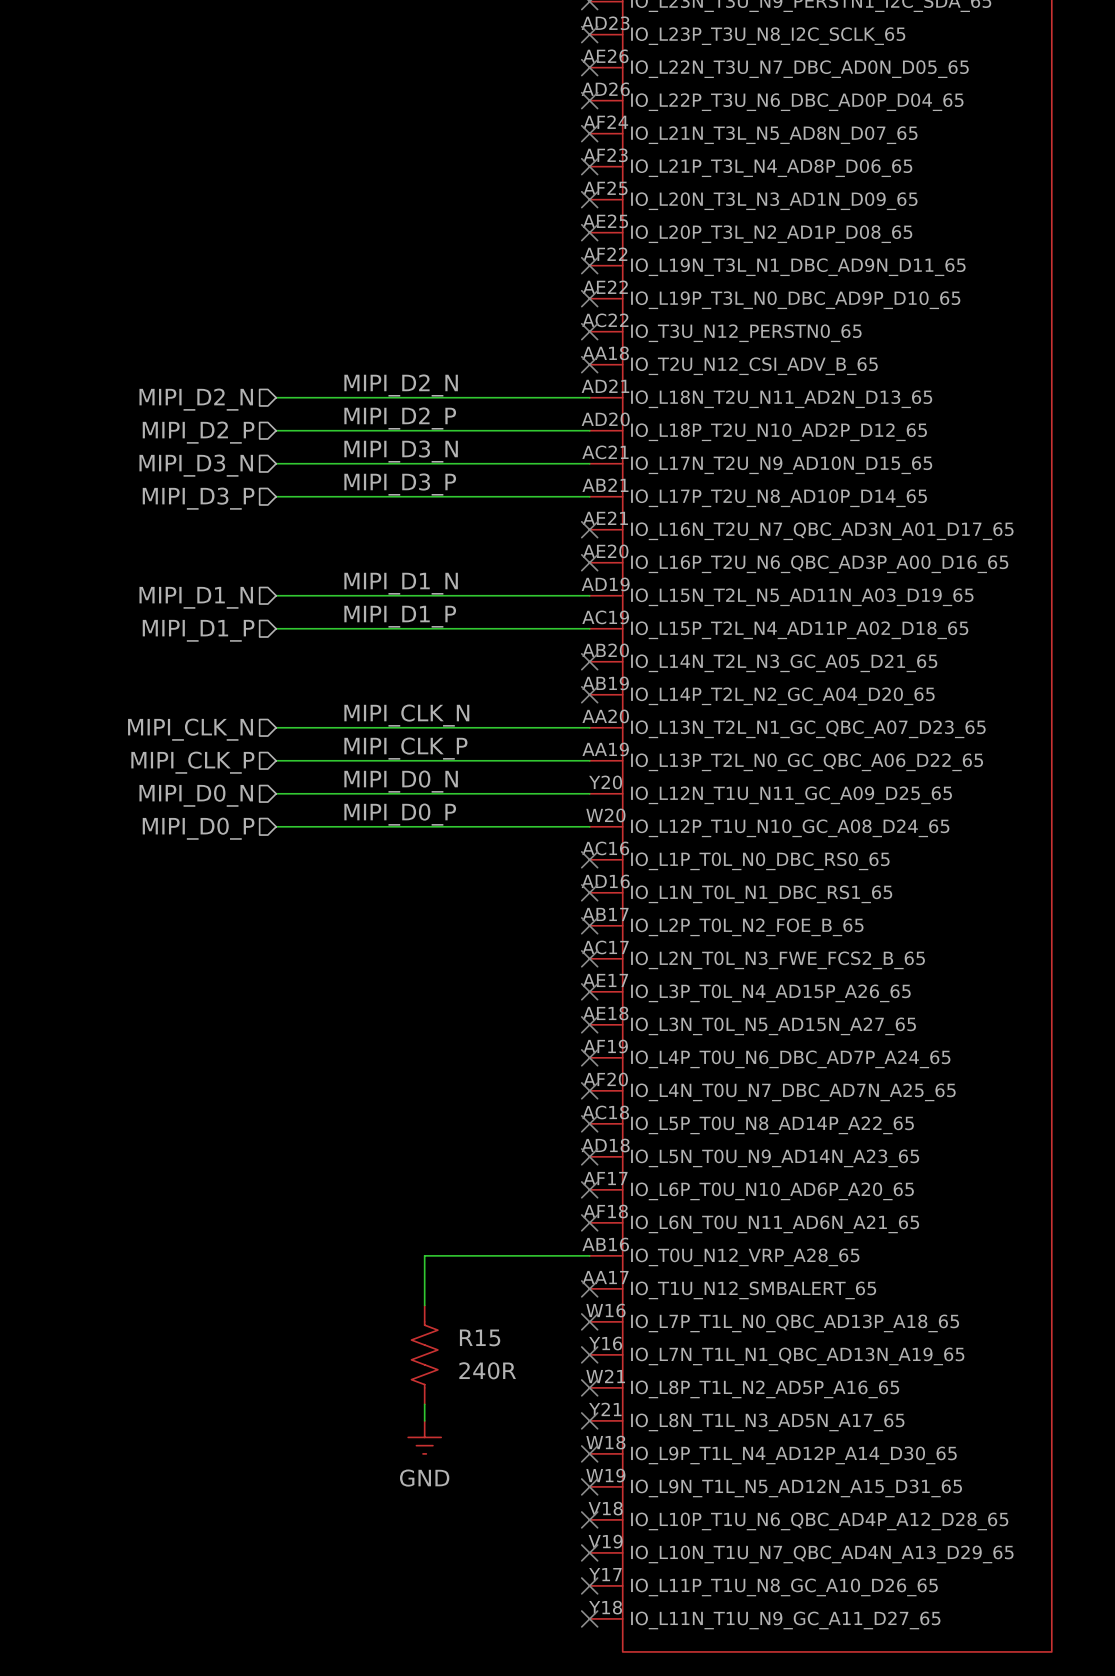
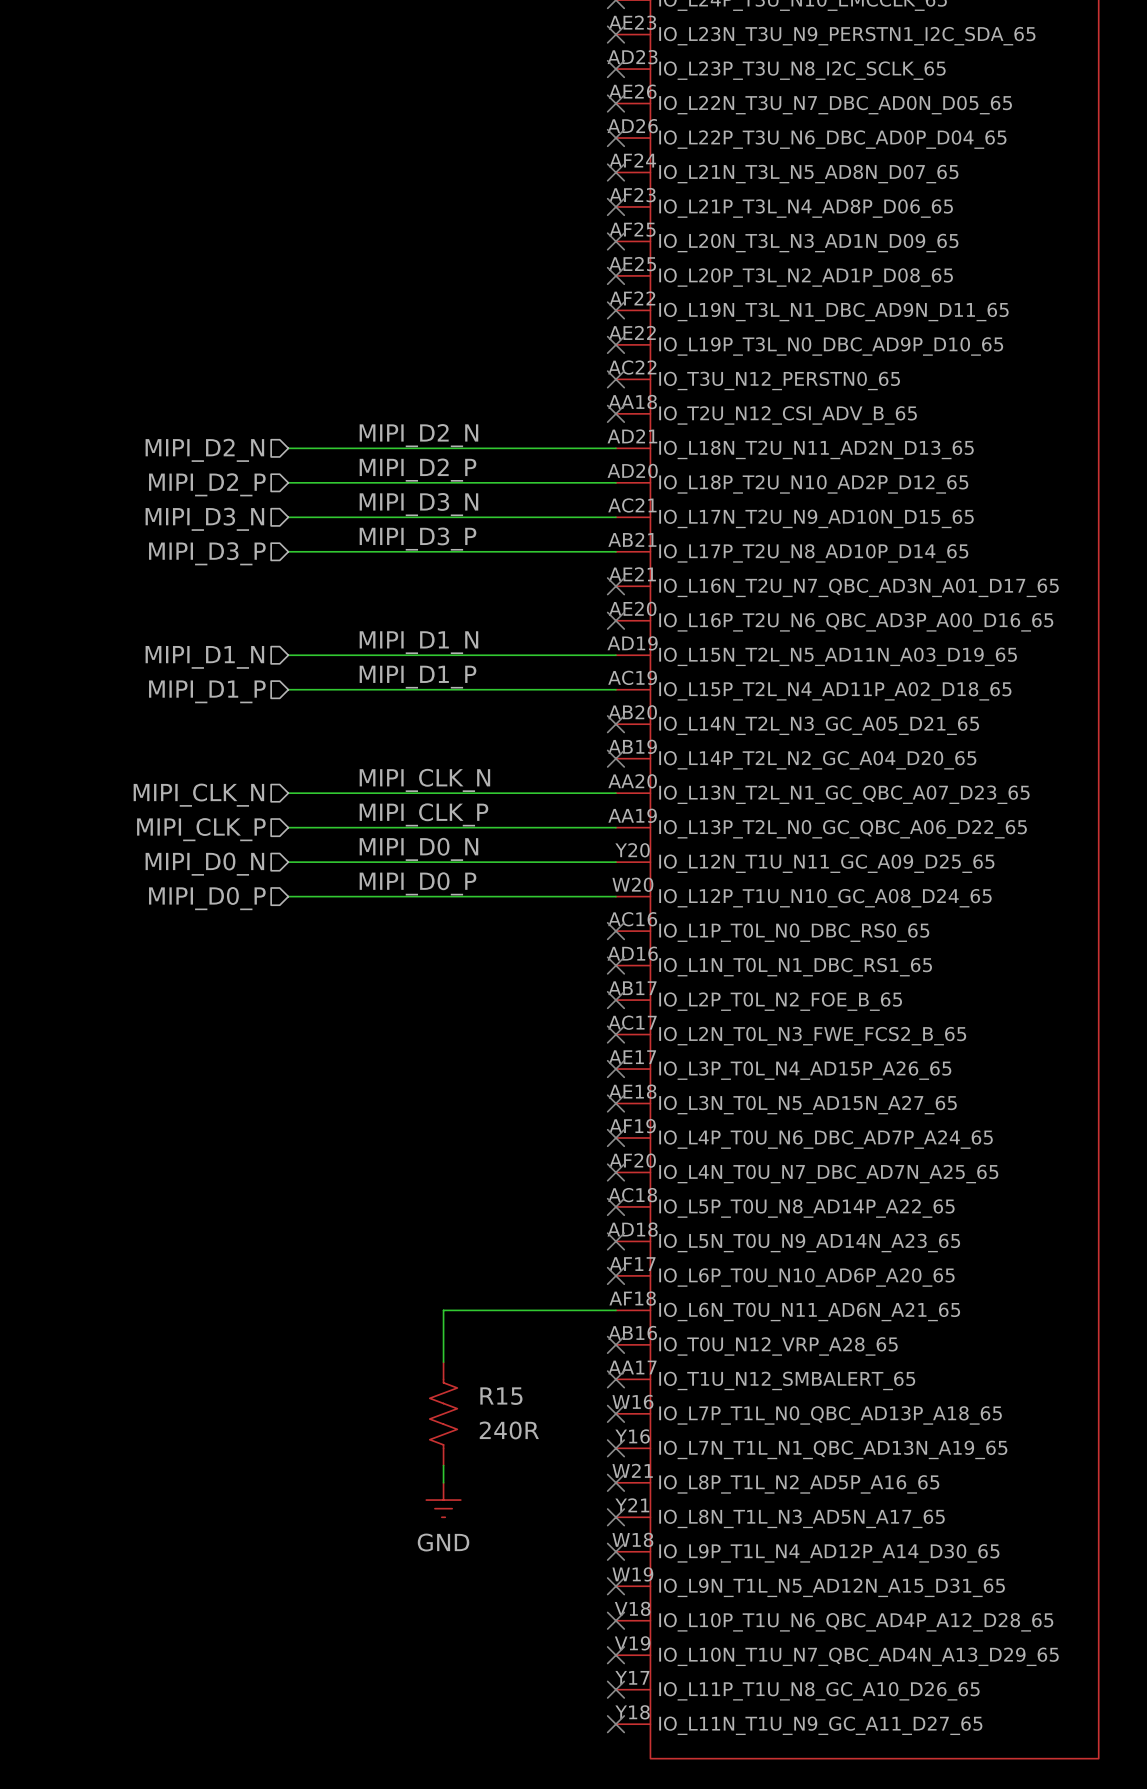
no-connect mark position: (589, 1222) -> (615, 1344)
wire: (424, 1255) (589, 1255) -> (443, 1344) (443, 1310) (615, 1310)
R15 position: (424, 1354) -> (443, 1413)
wire: (424, 1404) (424, 1420) -> (443, 1465) (443, 1482)
power symbol position: GND (424, 1437) -> GND (443, 1500)

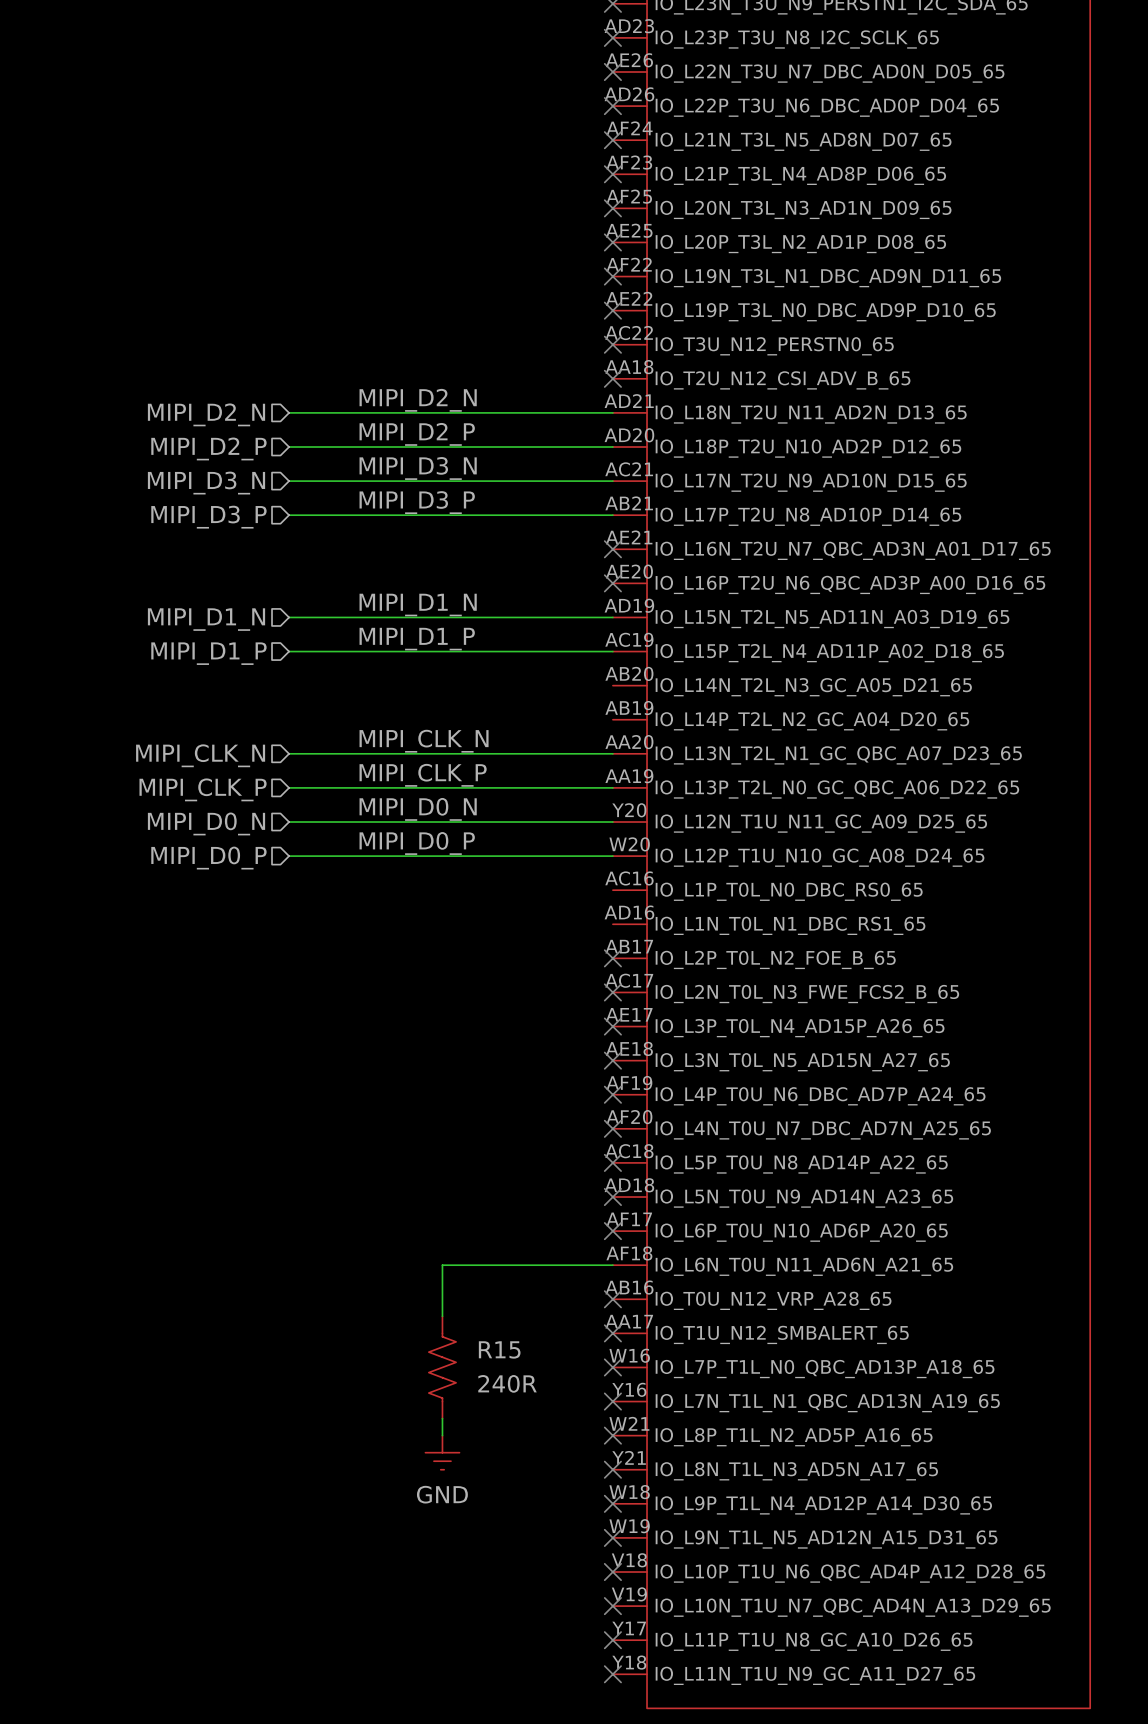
no-connect mark: (615, 724) -> none
no-connect mark: (615, 758) -> none
no-connect mark: (615, 931) -> none
no-connect mark: (615, 965) -> none

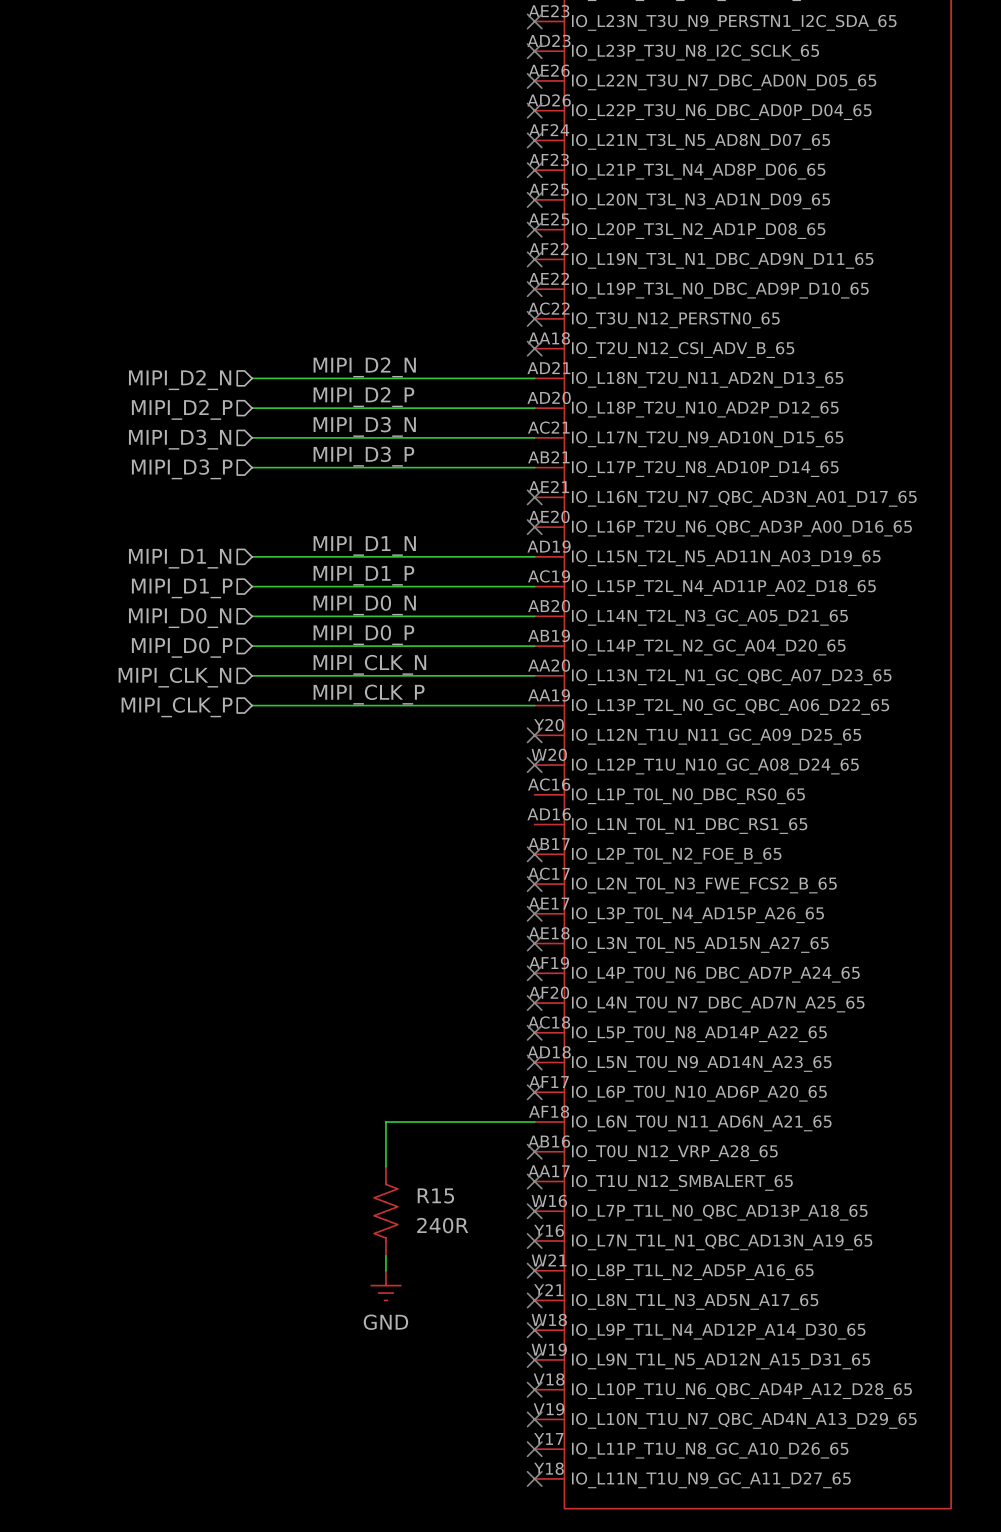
label position: MIPI_D0_N (418, 809) -> MIPI_D0_N (364, 605)
wire: (289, 822) (612, 822) -> (252, 646) (534, 646)
no-connect mark: none -> (534, 735)
hierarchical label position: MIPI_D0_N (206, 823) -> MIPI_D0_N (180, 618)
label position: MIPI_D0_P (417, 843) -> MIPI_D0_P (363, 635)
wire: (289, 856) (612, 856) -> (252, 616) (534, 616)
no-connect mark: none -> (534, 765)
hierarchical label position: MIPI_D0_P (208, 858) -> MIPI_D0_P (182, 647)

